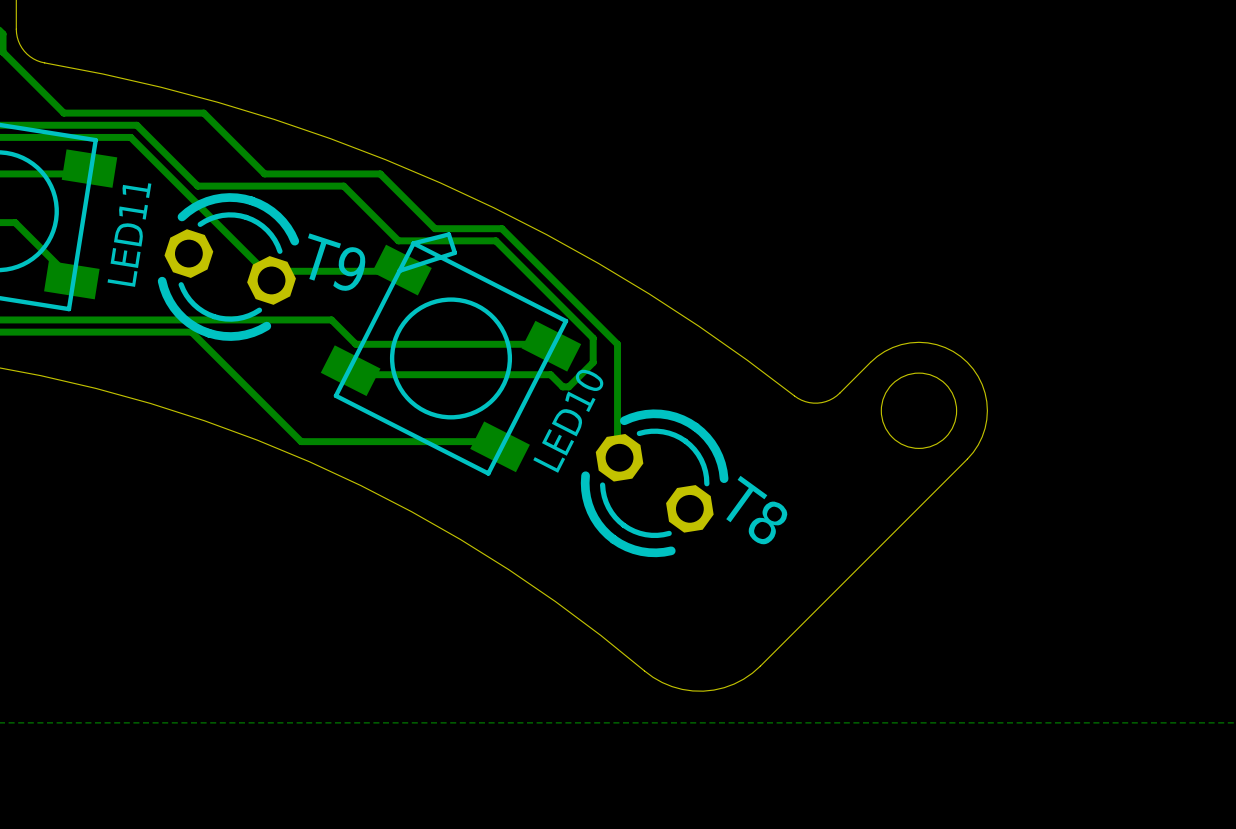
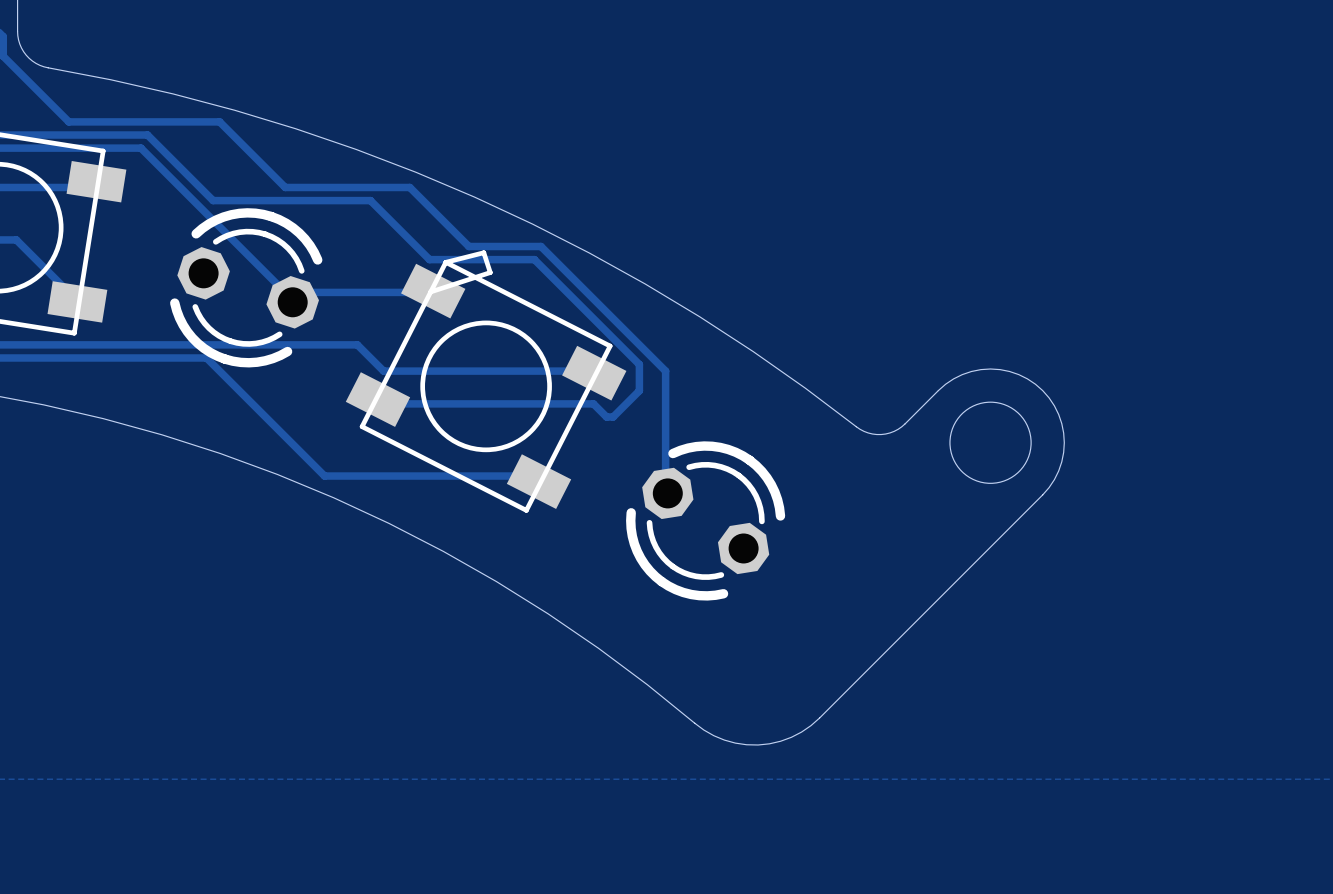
LED11 name: LED11 (129, 235) -> none
T9 name: T9 (337, 262) -> none
LED10 name: LED10 (568, 421) -> none
T8 name: T8 (757, 510) -> none

